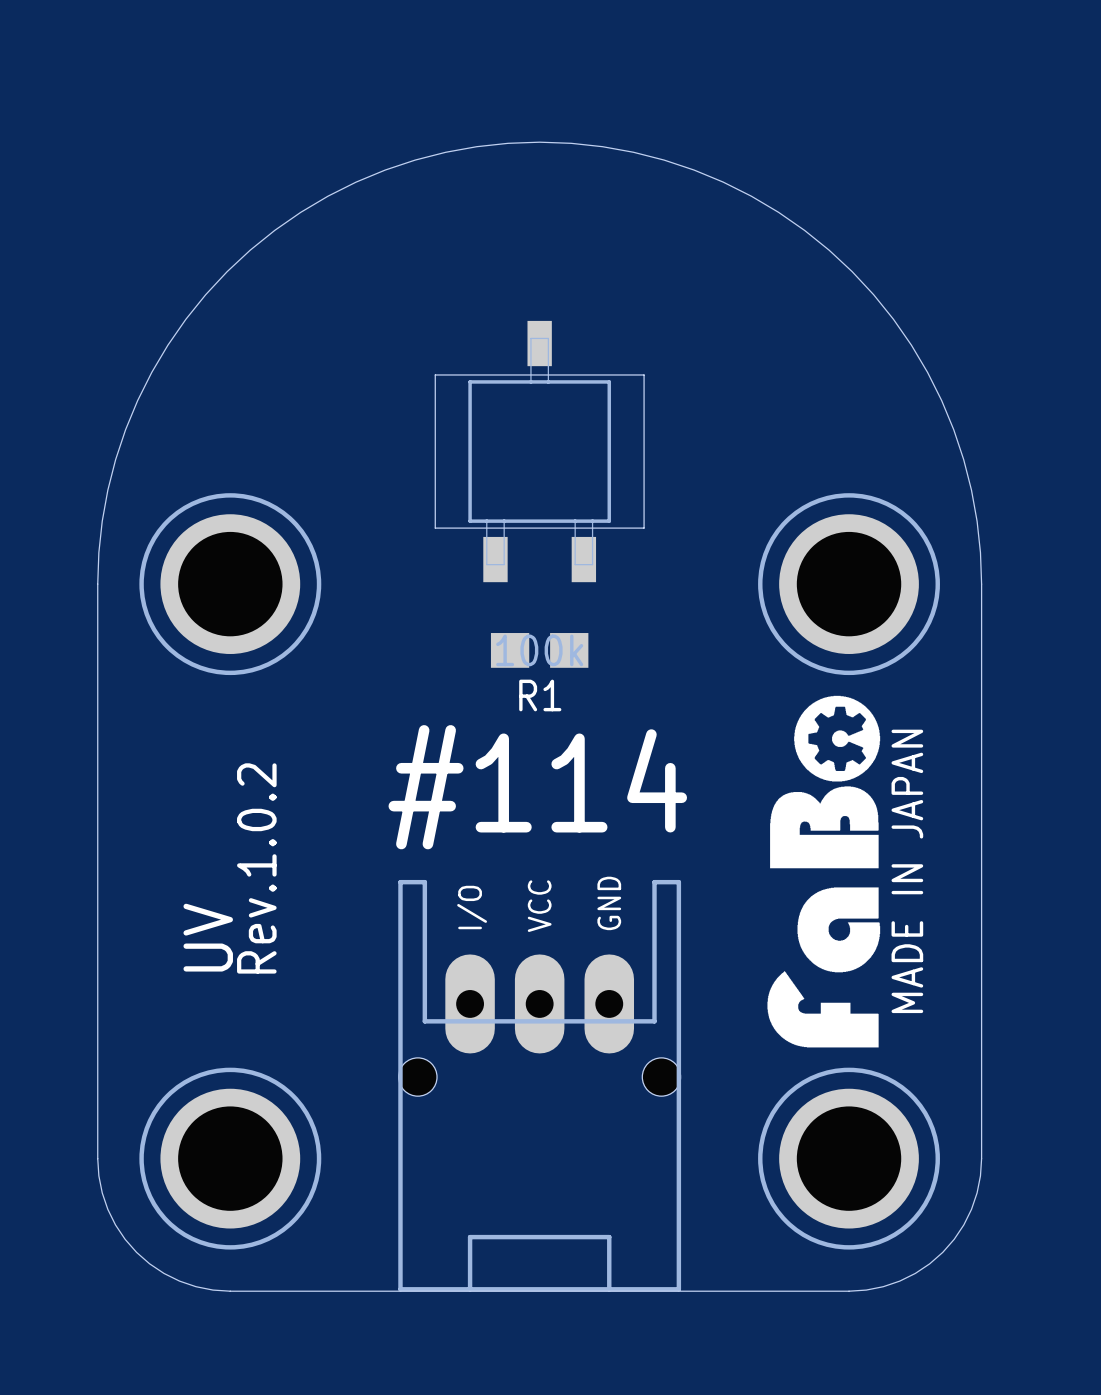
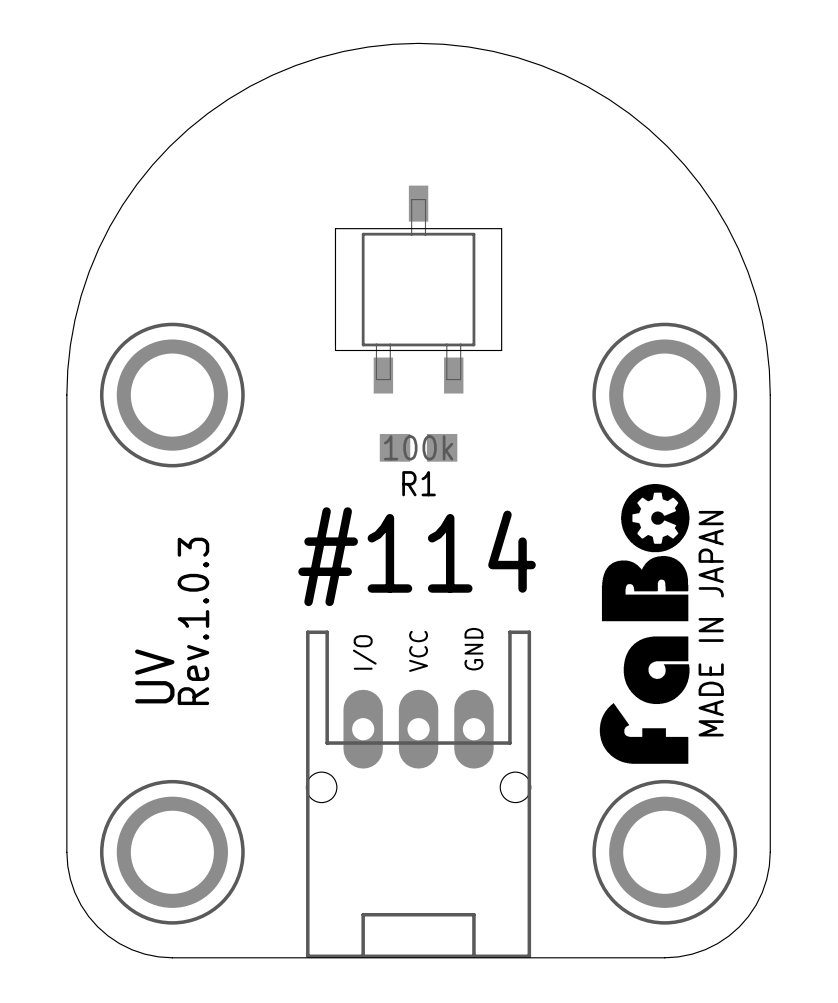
text: Rev.1.0.2 (256, 868) -> Rev.1.0.3 (193, 621)

